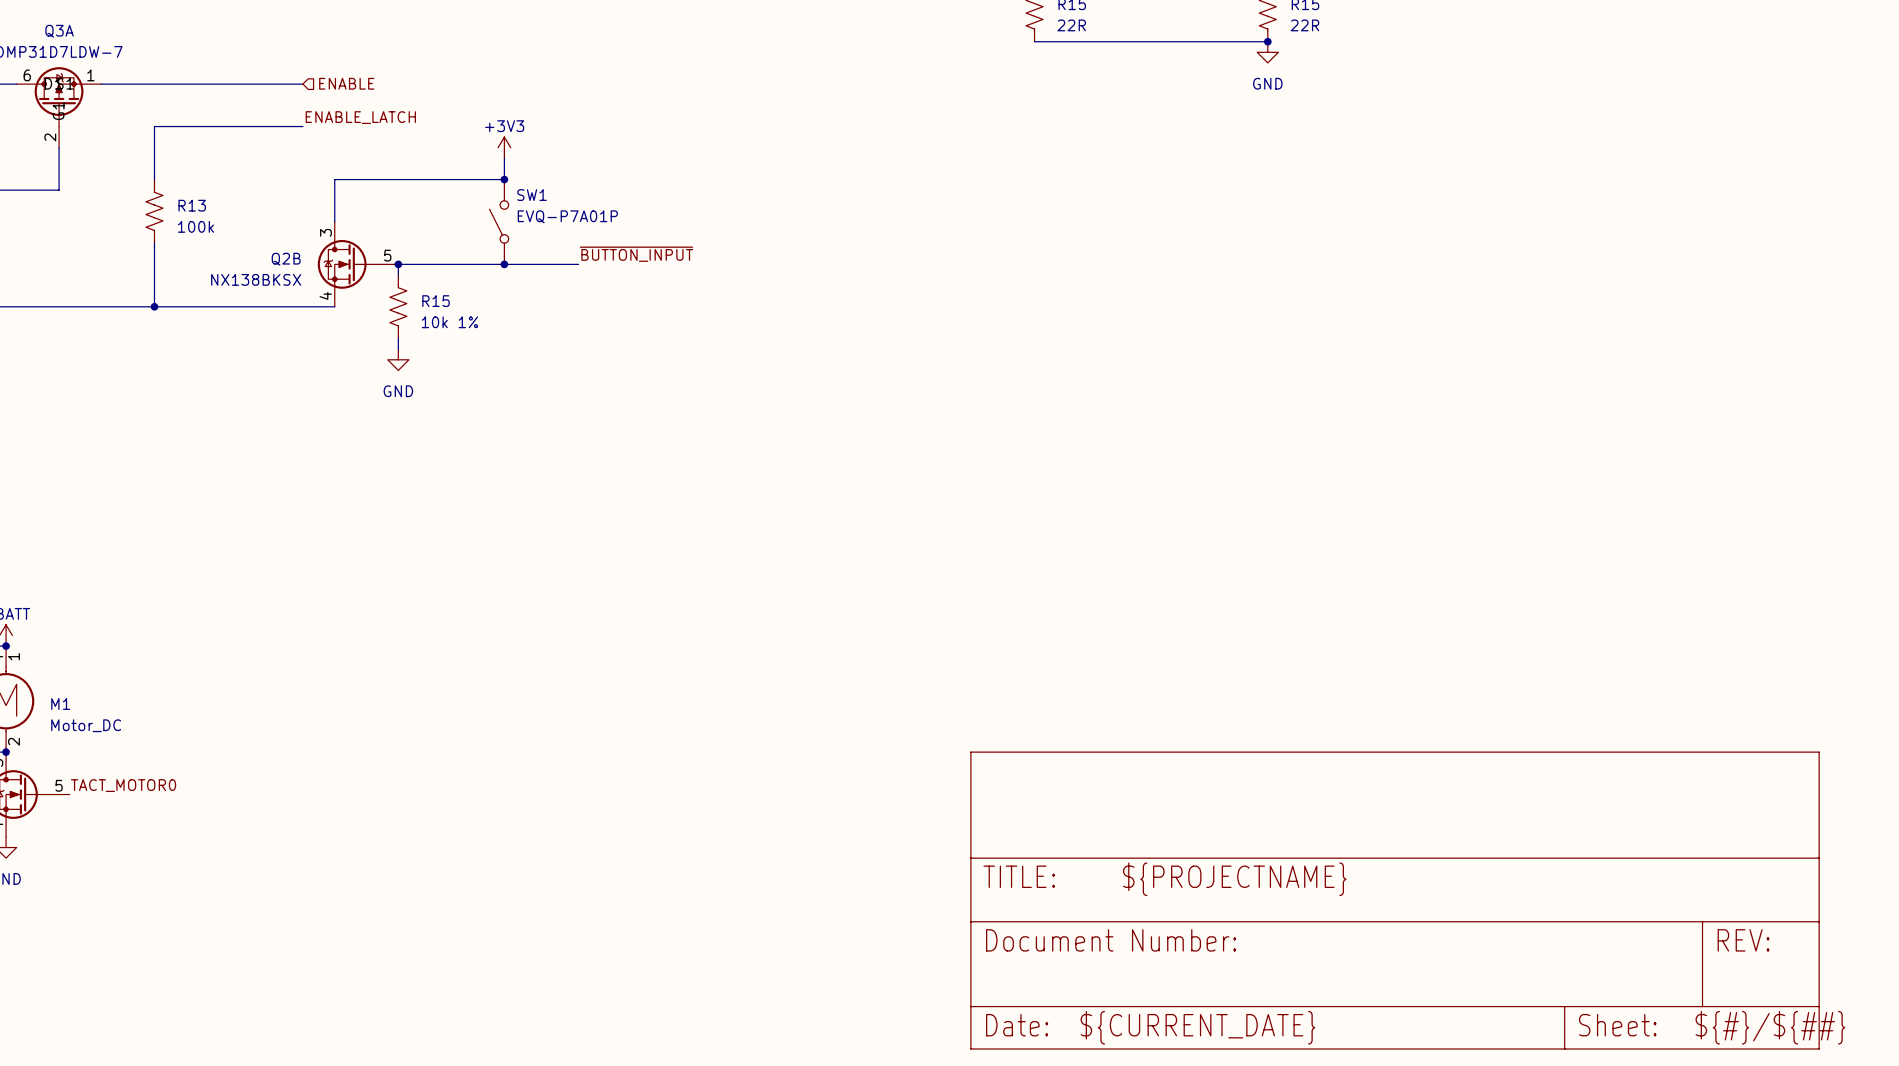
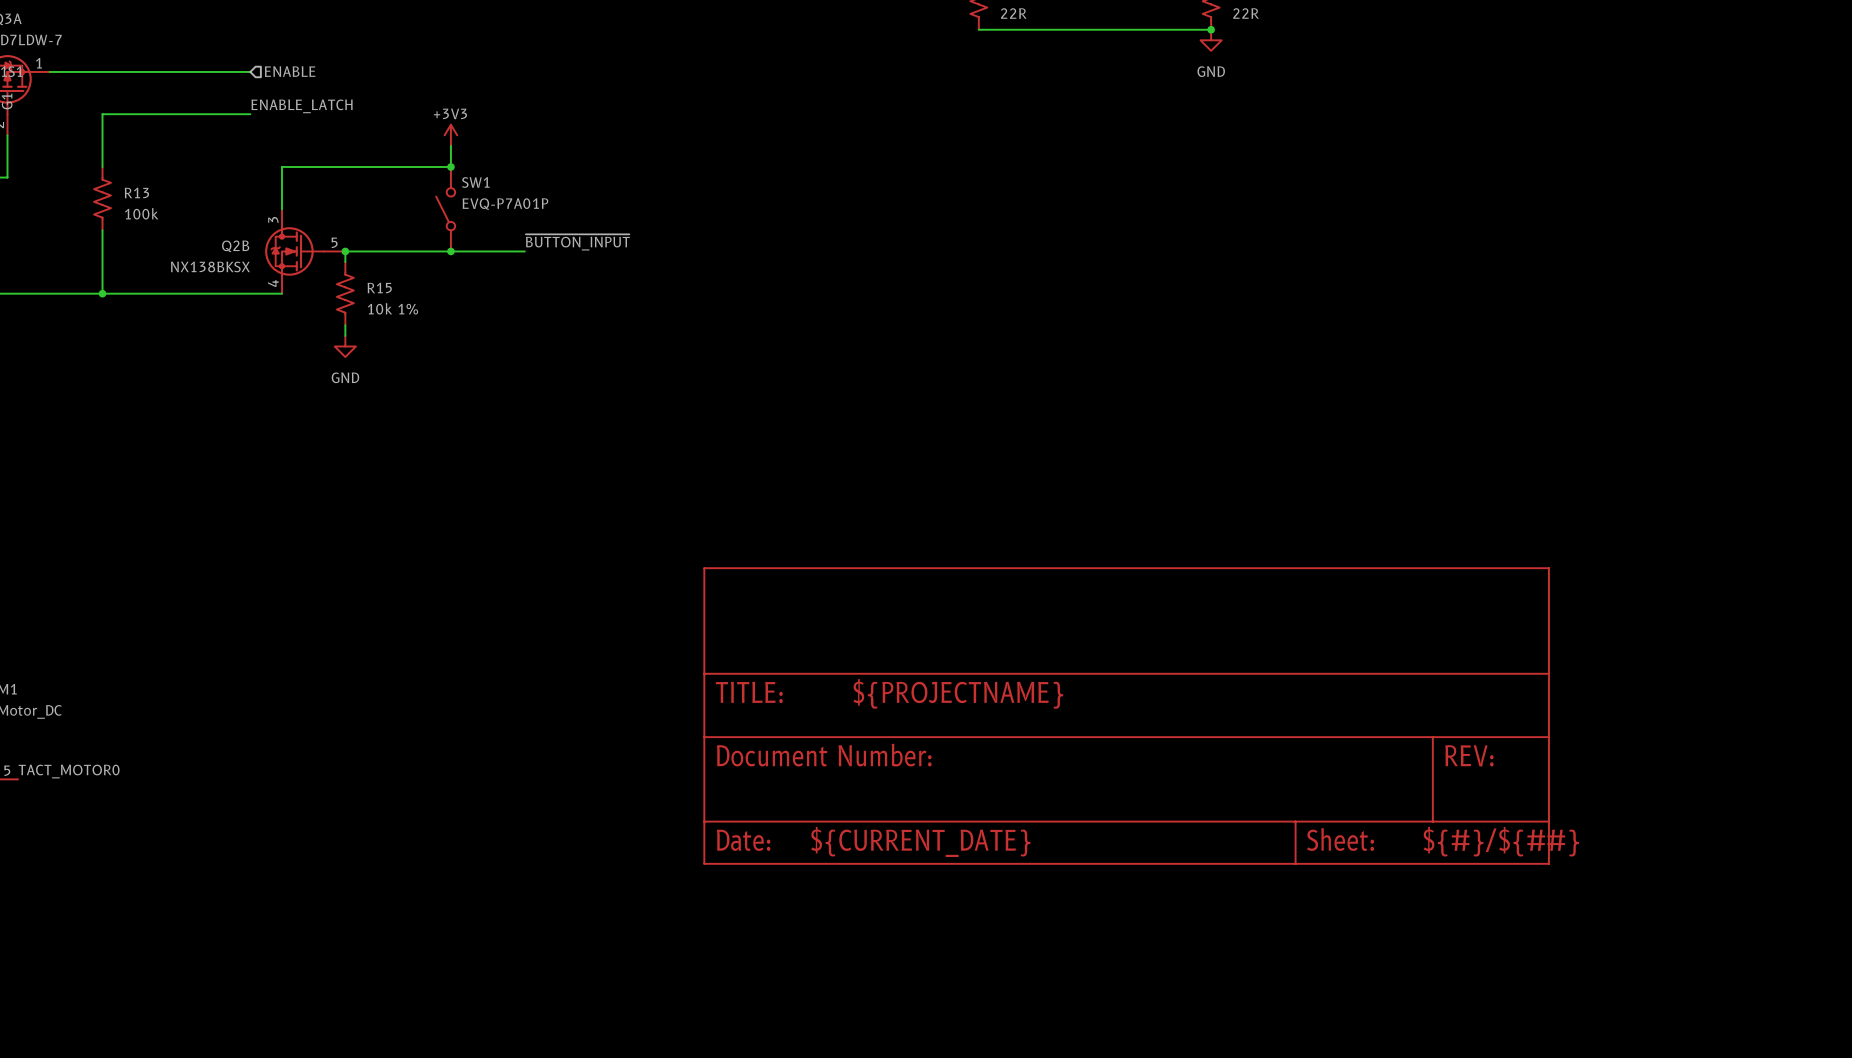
power symbol: none -> (1126, 716)
power symbol: (1395, 900) -> none

